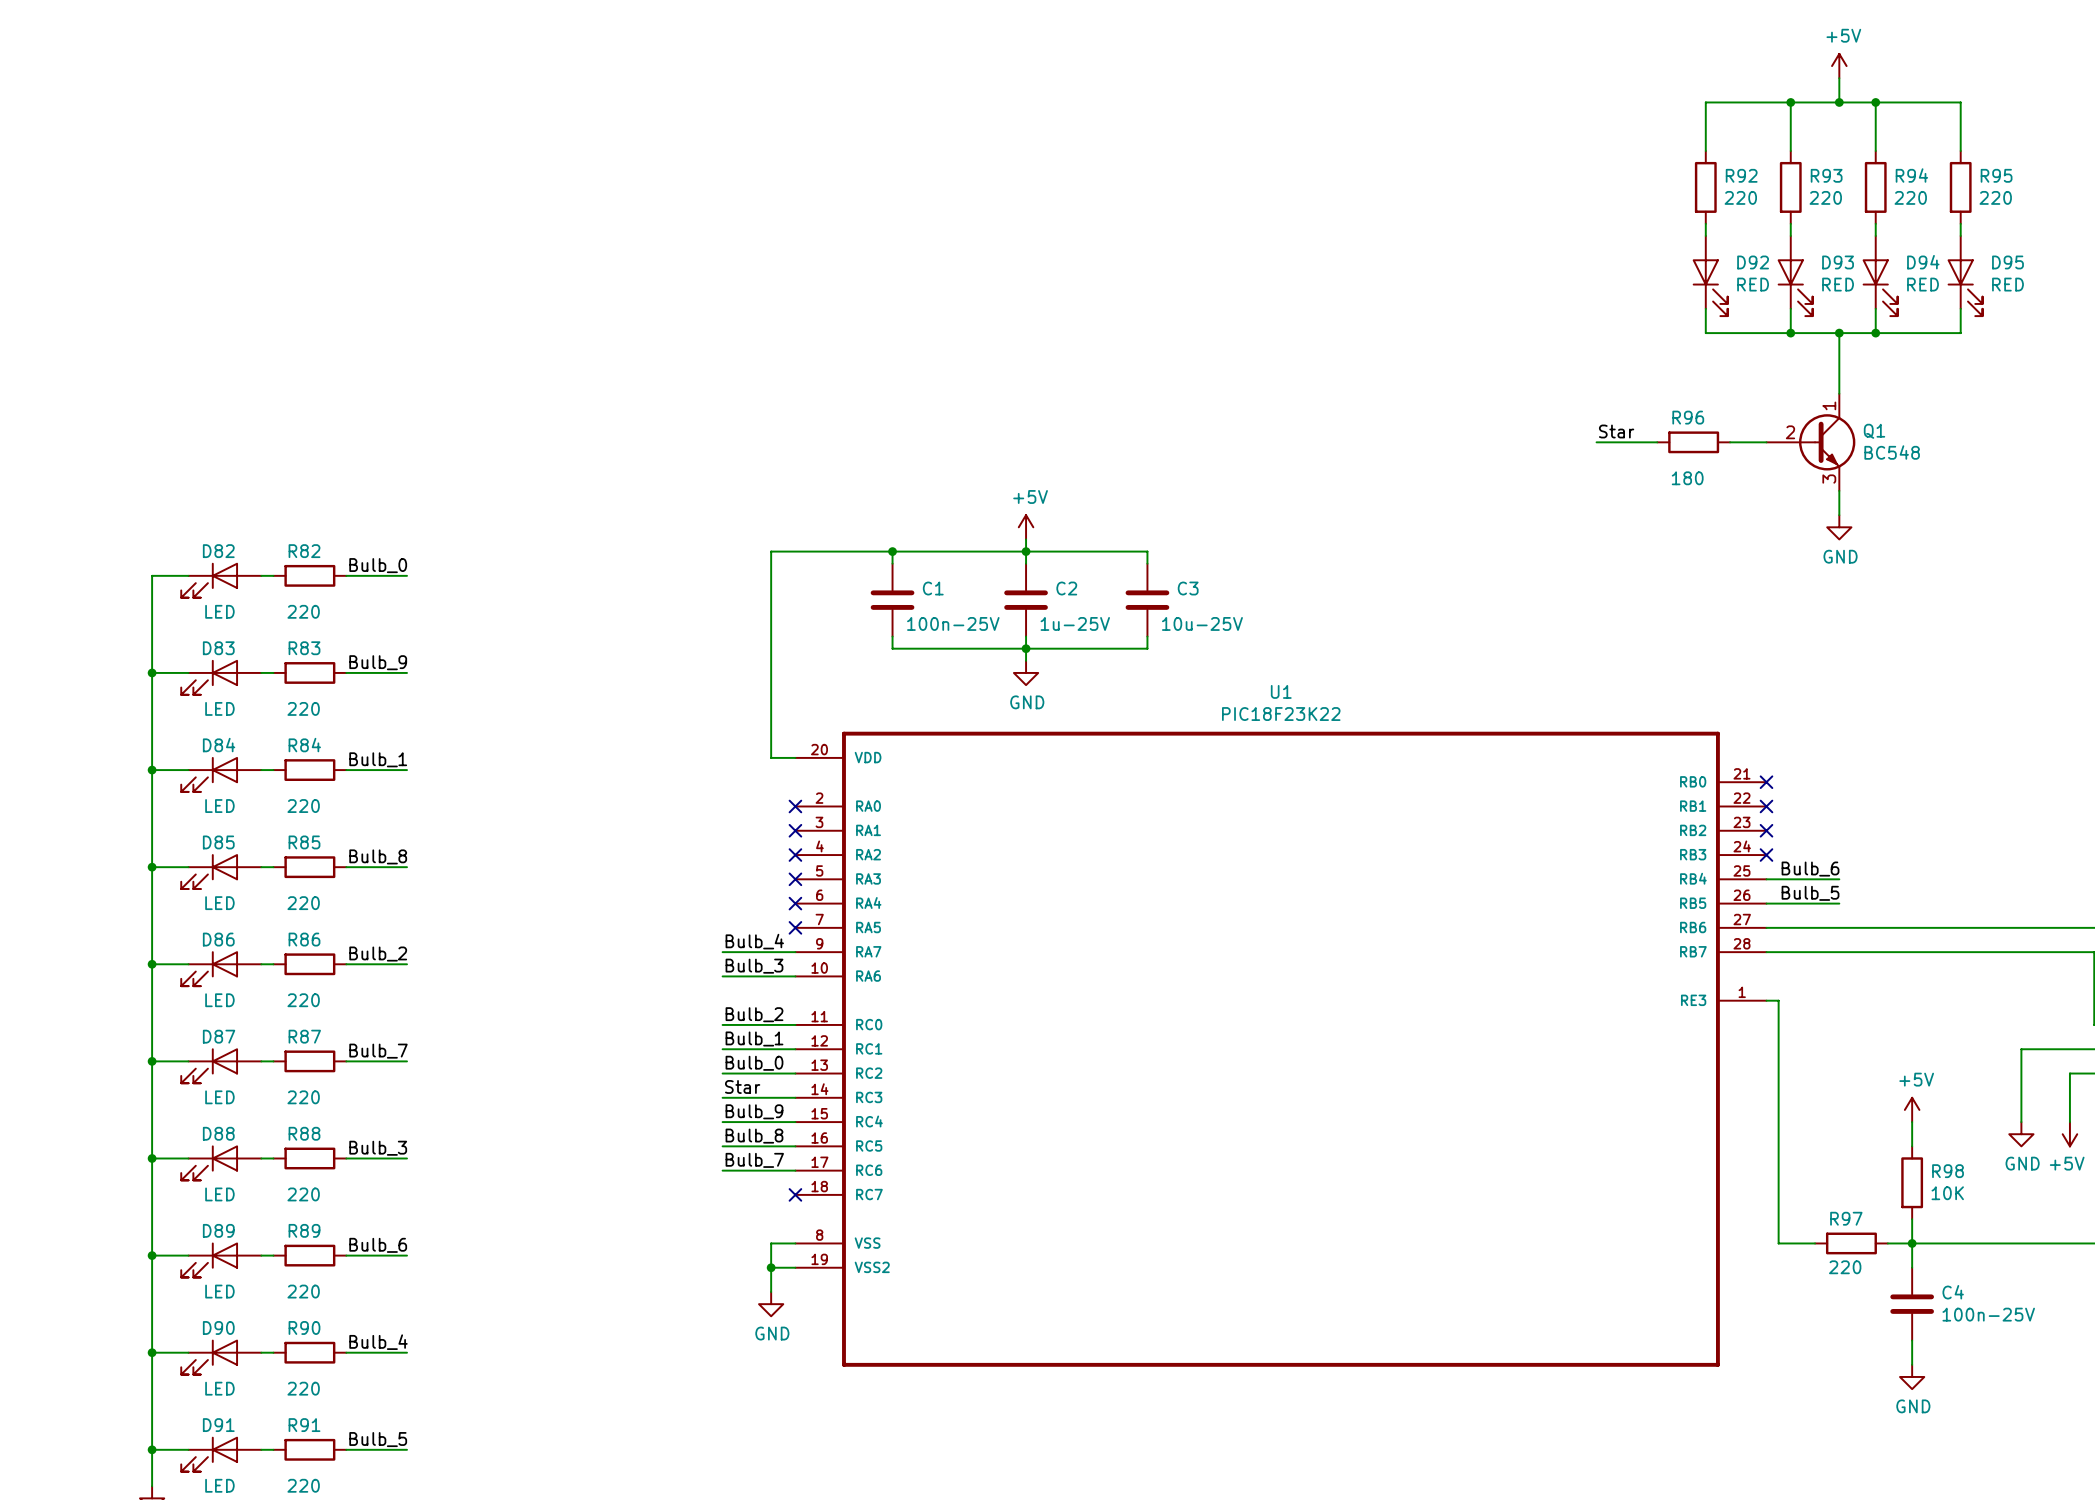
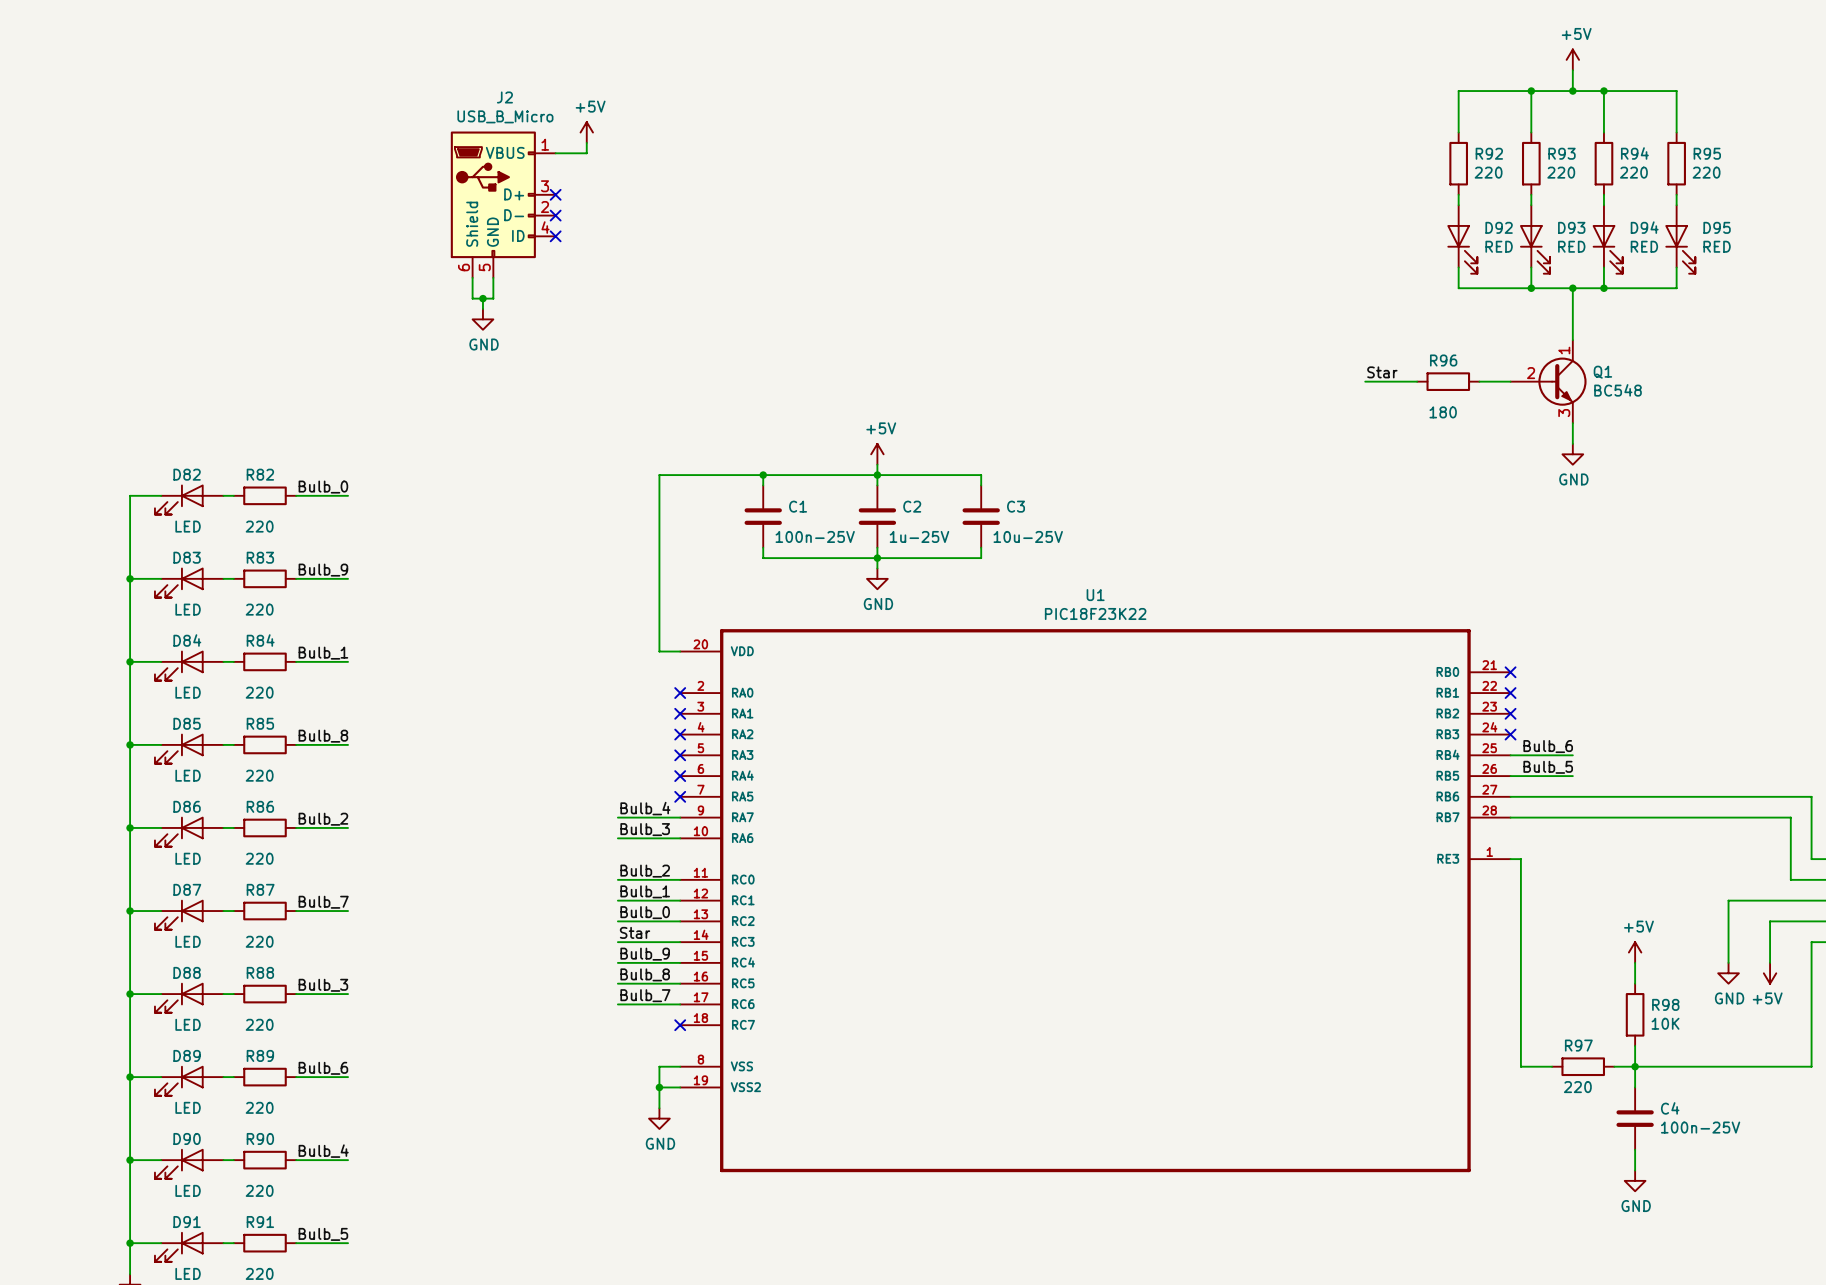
power symbol: none -> +5V (586, 132)
wire: none -> (586, 142) (586, 153) (555, 153)
no-connect mark: none -> (555, 194)
J2: none -> USB_B_Micro (503, 204)
no-connect mark: none -> (555, 215)
no-connect mark: none -> (555, 236)
wire: none -> (472, 277) (472, 298) (493, 298) (493, 277)
wire: none -> (482, 298) (482, 308)
junction: none -> (482, 298)
power symbol: none -> GND (482, 319)

